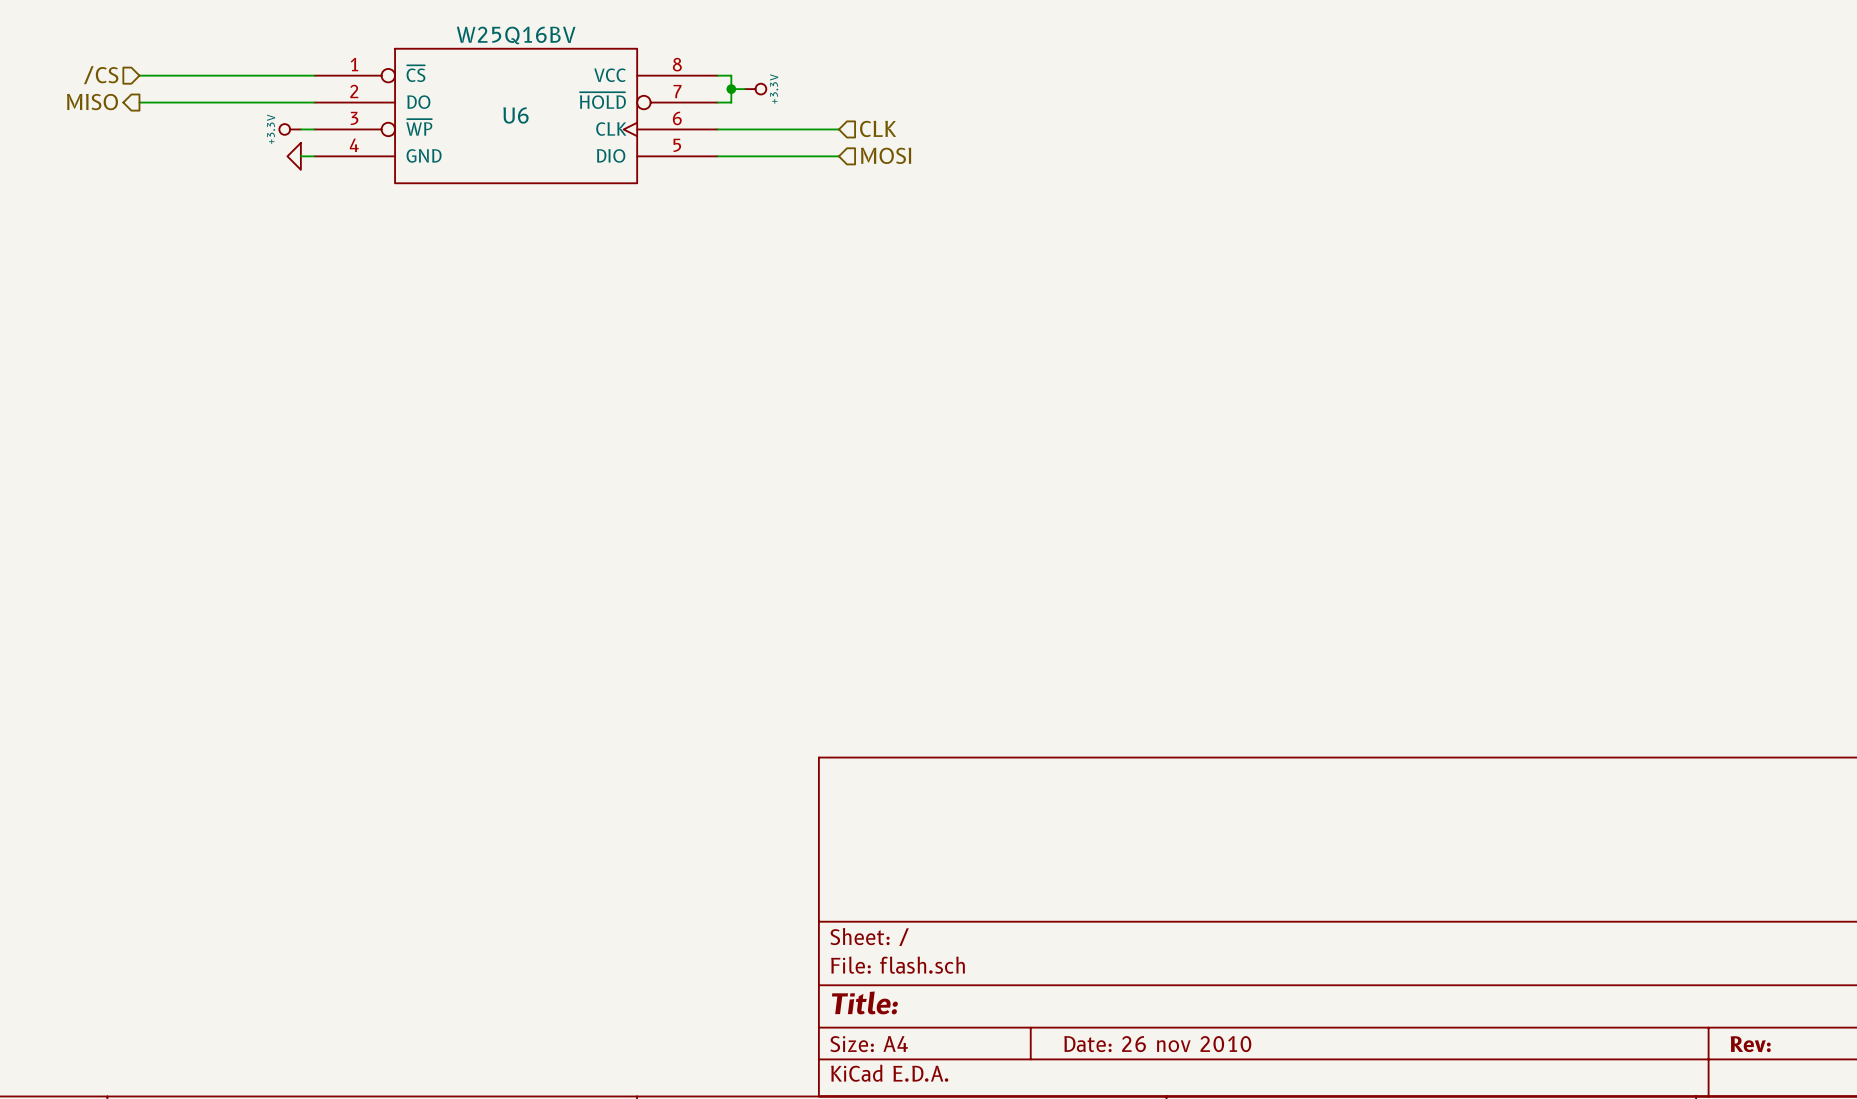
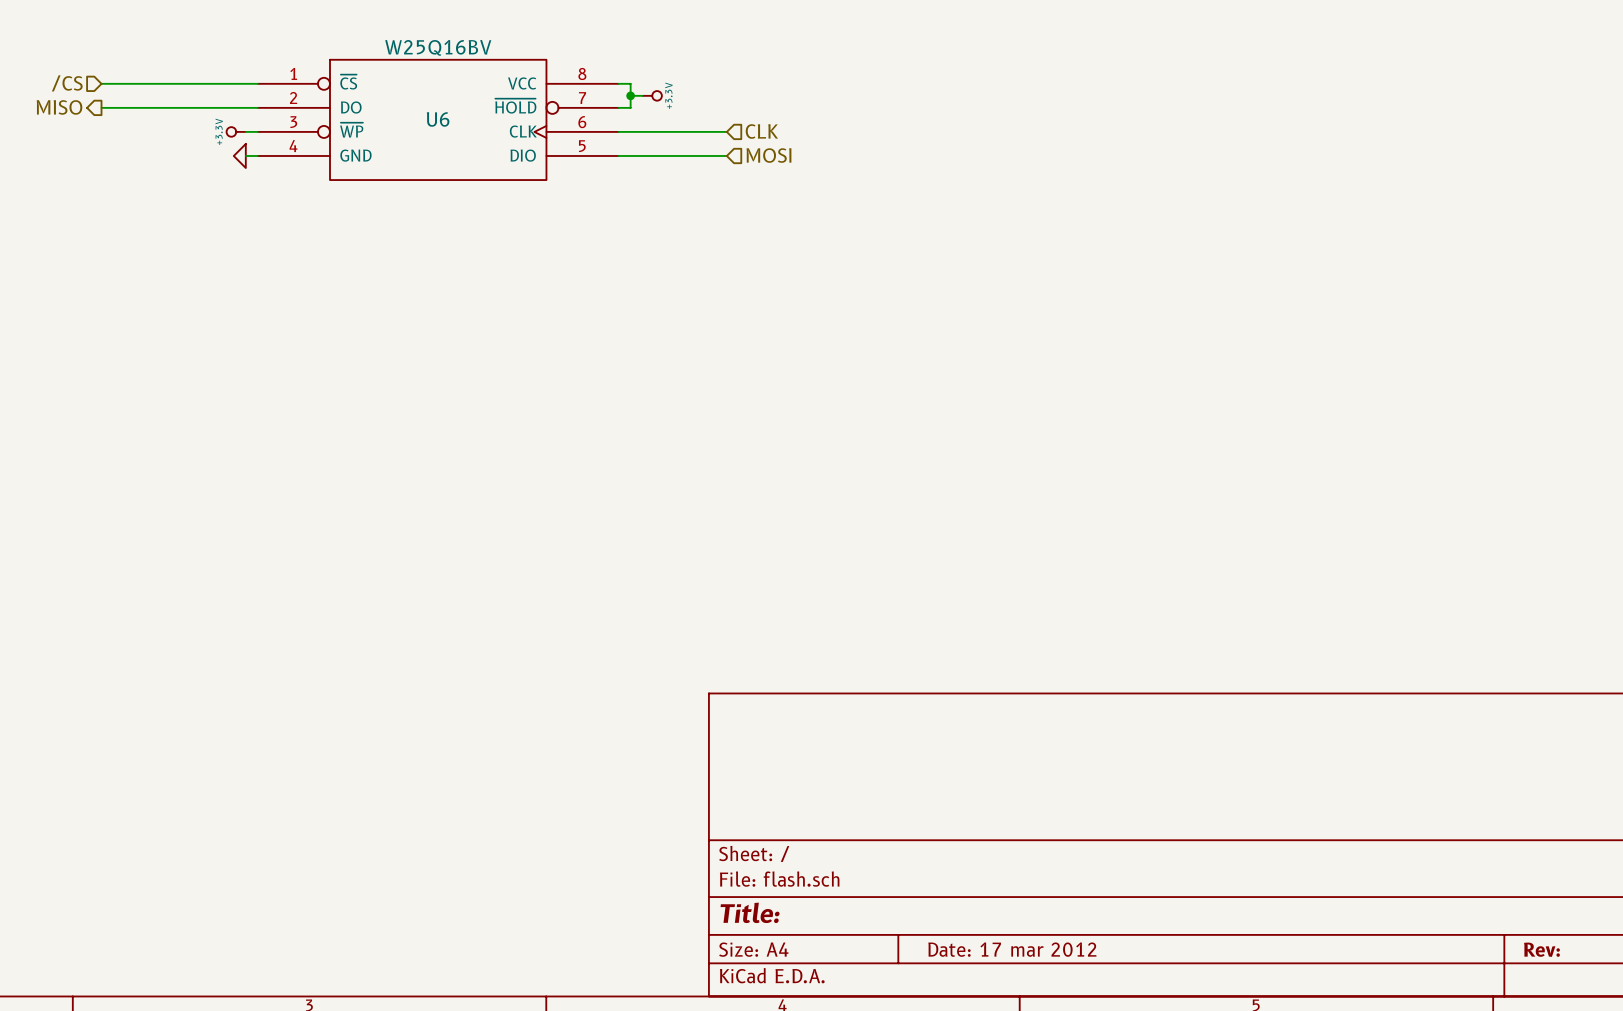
title block: Date: 26 nov 2010 (1157, 1044) -> Date: 17 mar 2012 (1012, 949)

